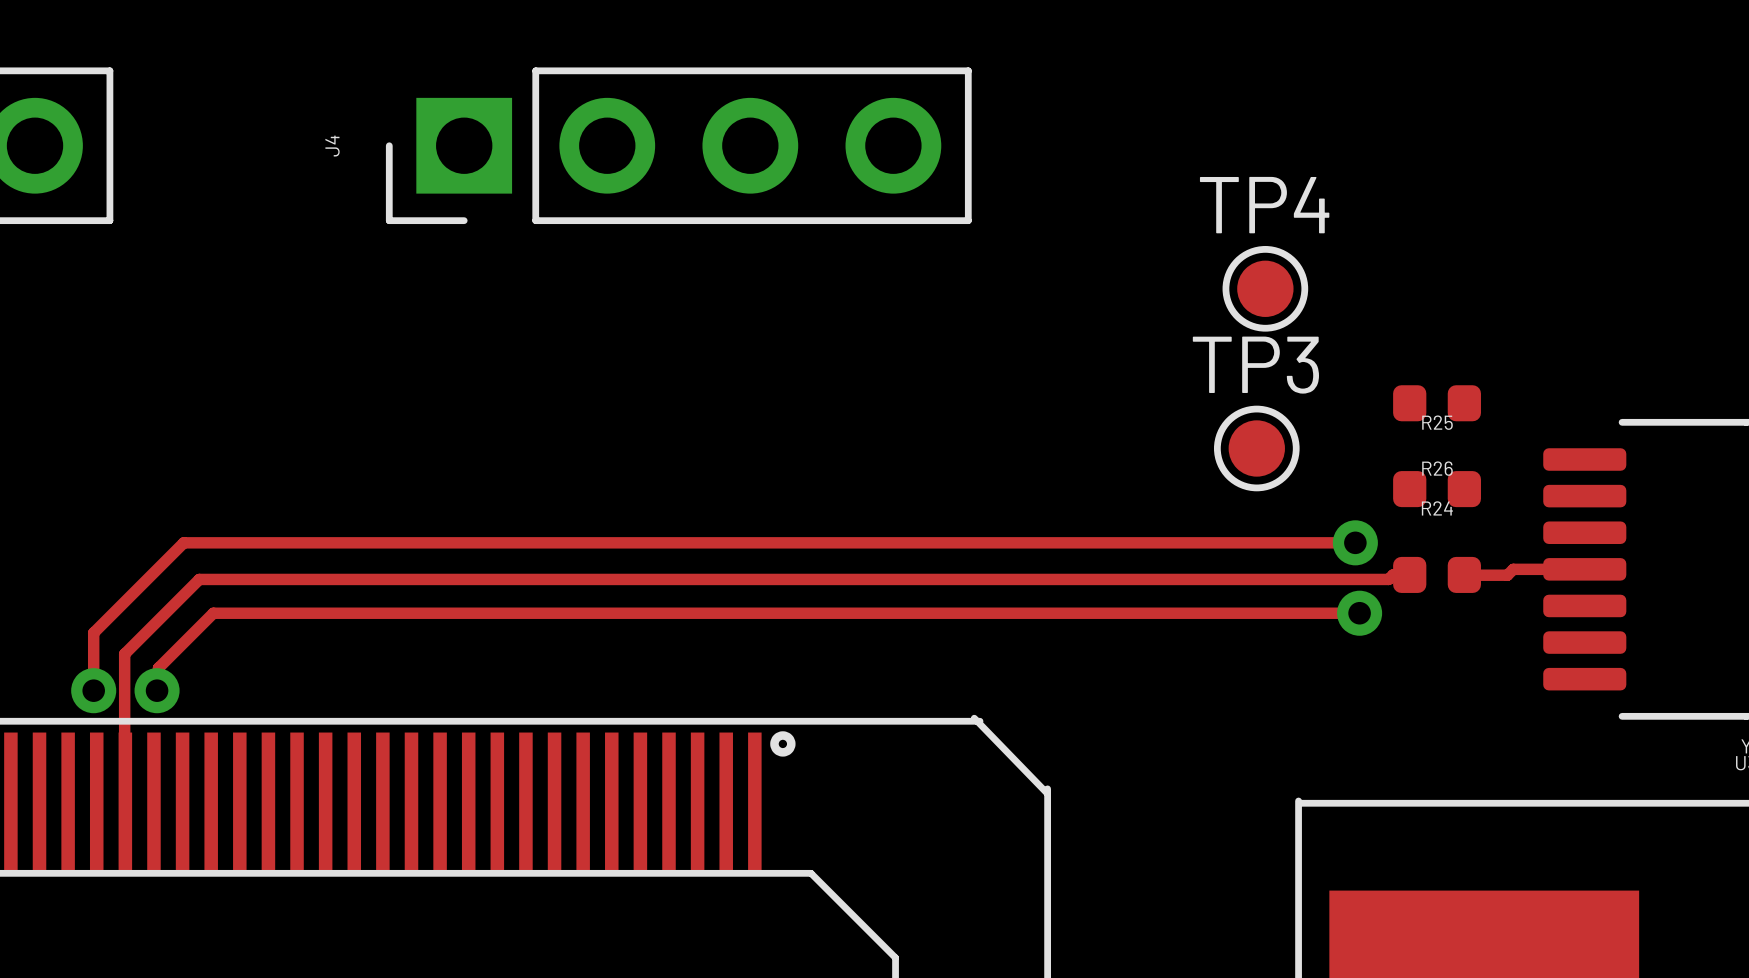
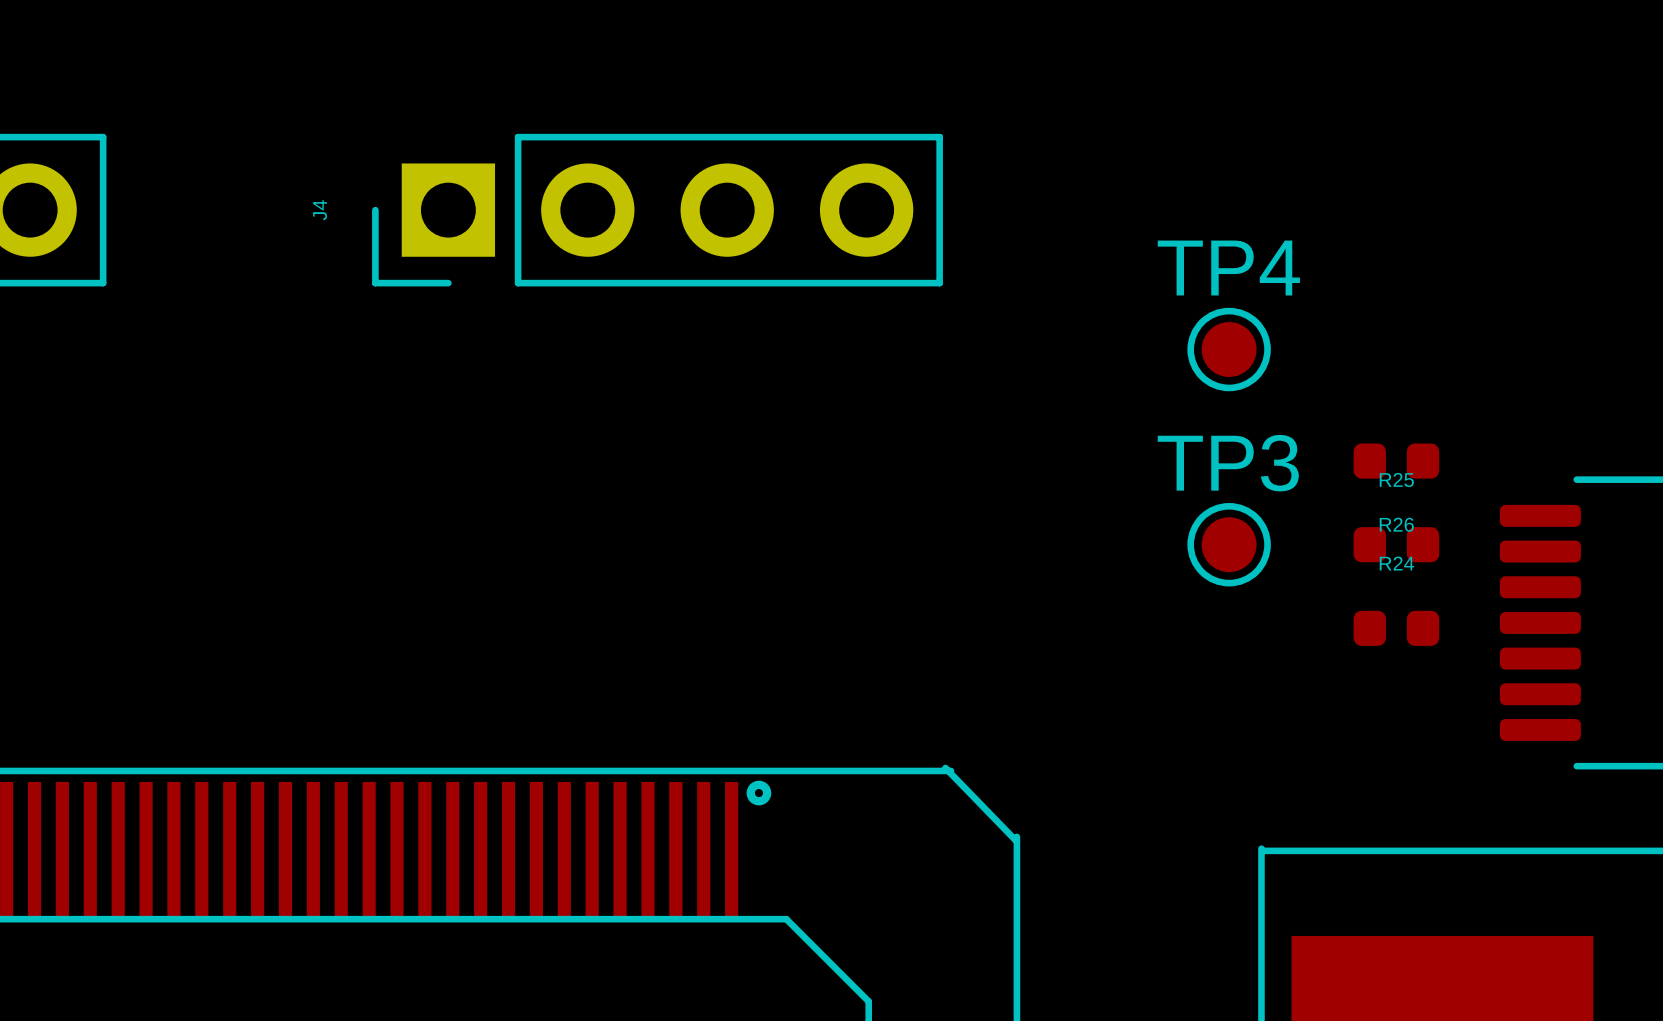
TP3 position: (1256, 448) -> (1229, 544)
track: (1355, 542) (183, 542) (93, 632) (93, 690) -> none
via: (1355, 542) -> none
track: (1584, 569) (1513, 569) (1507, 575) (1465, 575) -> none
track: (1409, 574) (1393, 574) (1388, 579) (199, 579) (124, 654) (124, 866) -> none
track: (1359, 613) (213, 613) (158, 668) (157, 690) -> none
via: (1359, 613) -> none
via: (93, 690) -> none
via: (157, 690) -> none

